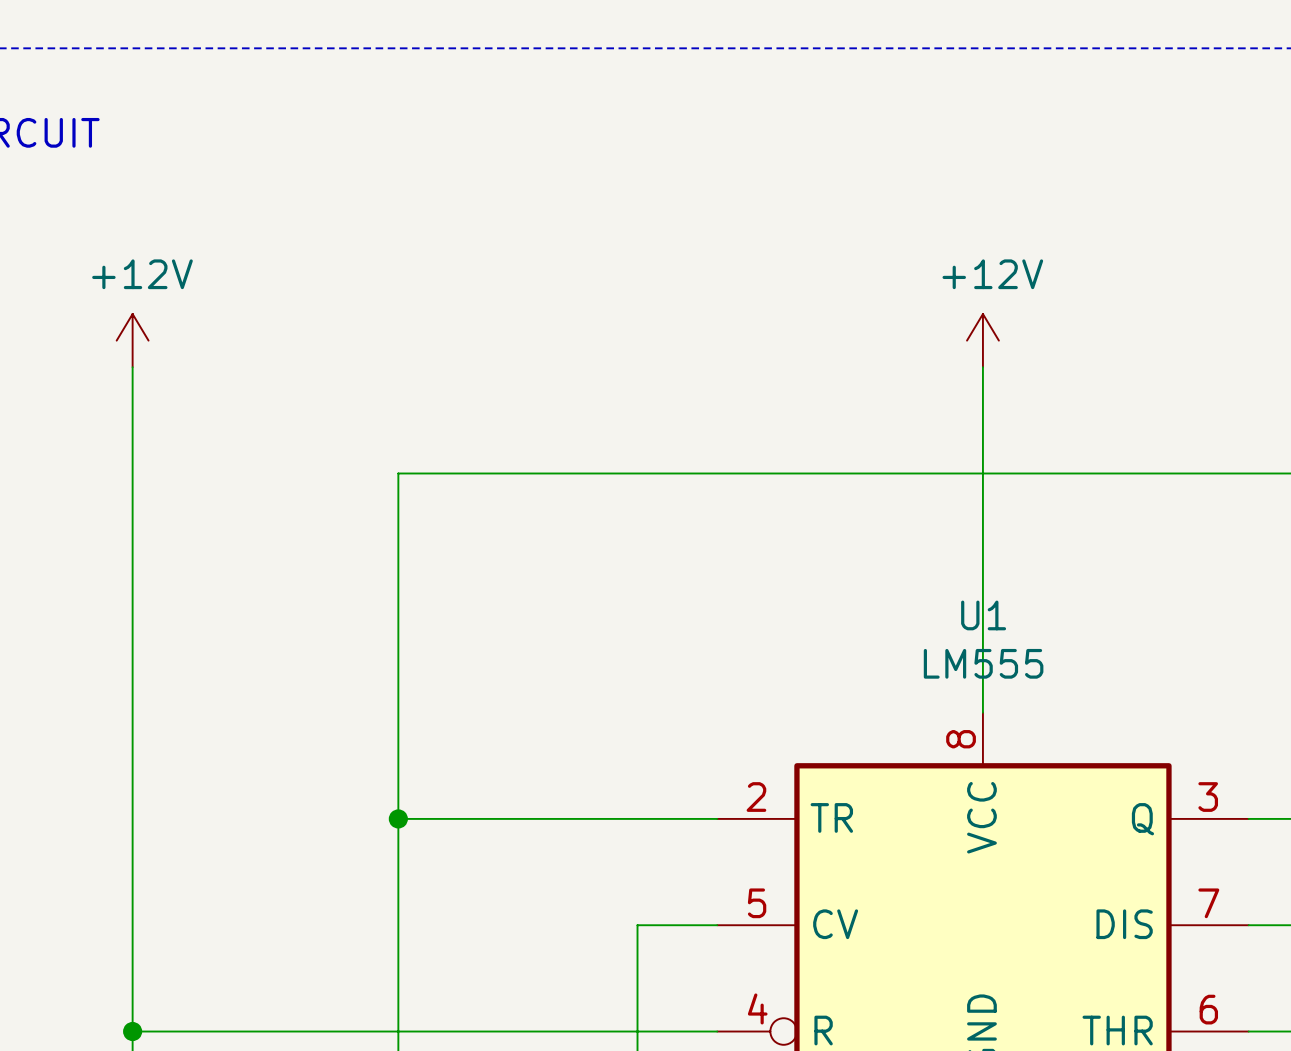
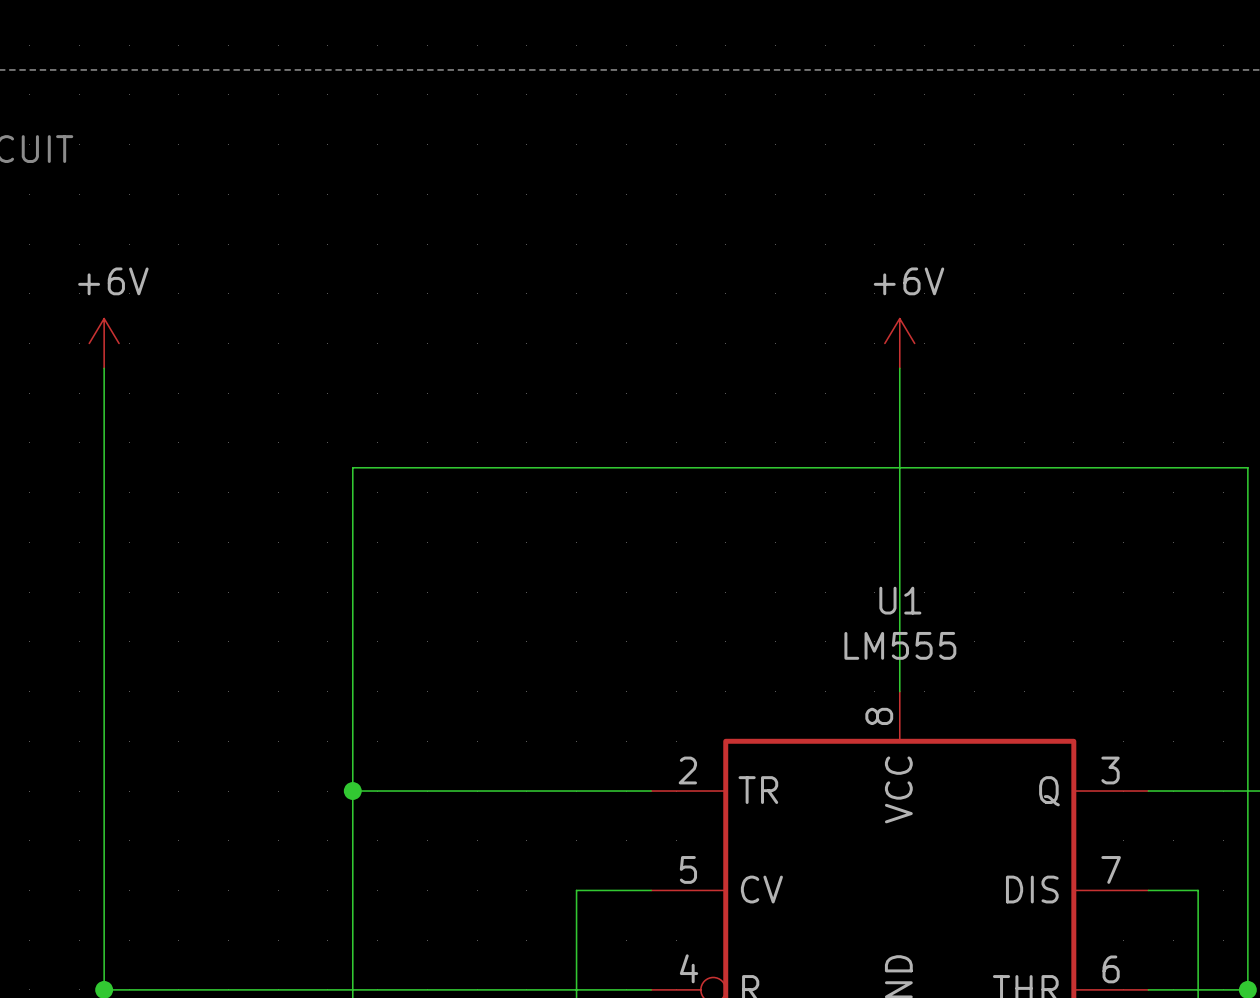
power symbol: +12V (132, 340) -> +6V (104, 343)
power symbol: +12V (982, 340) -> +6V (899, 343)

